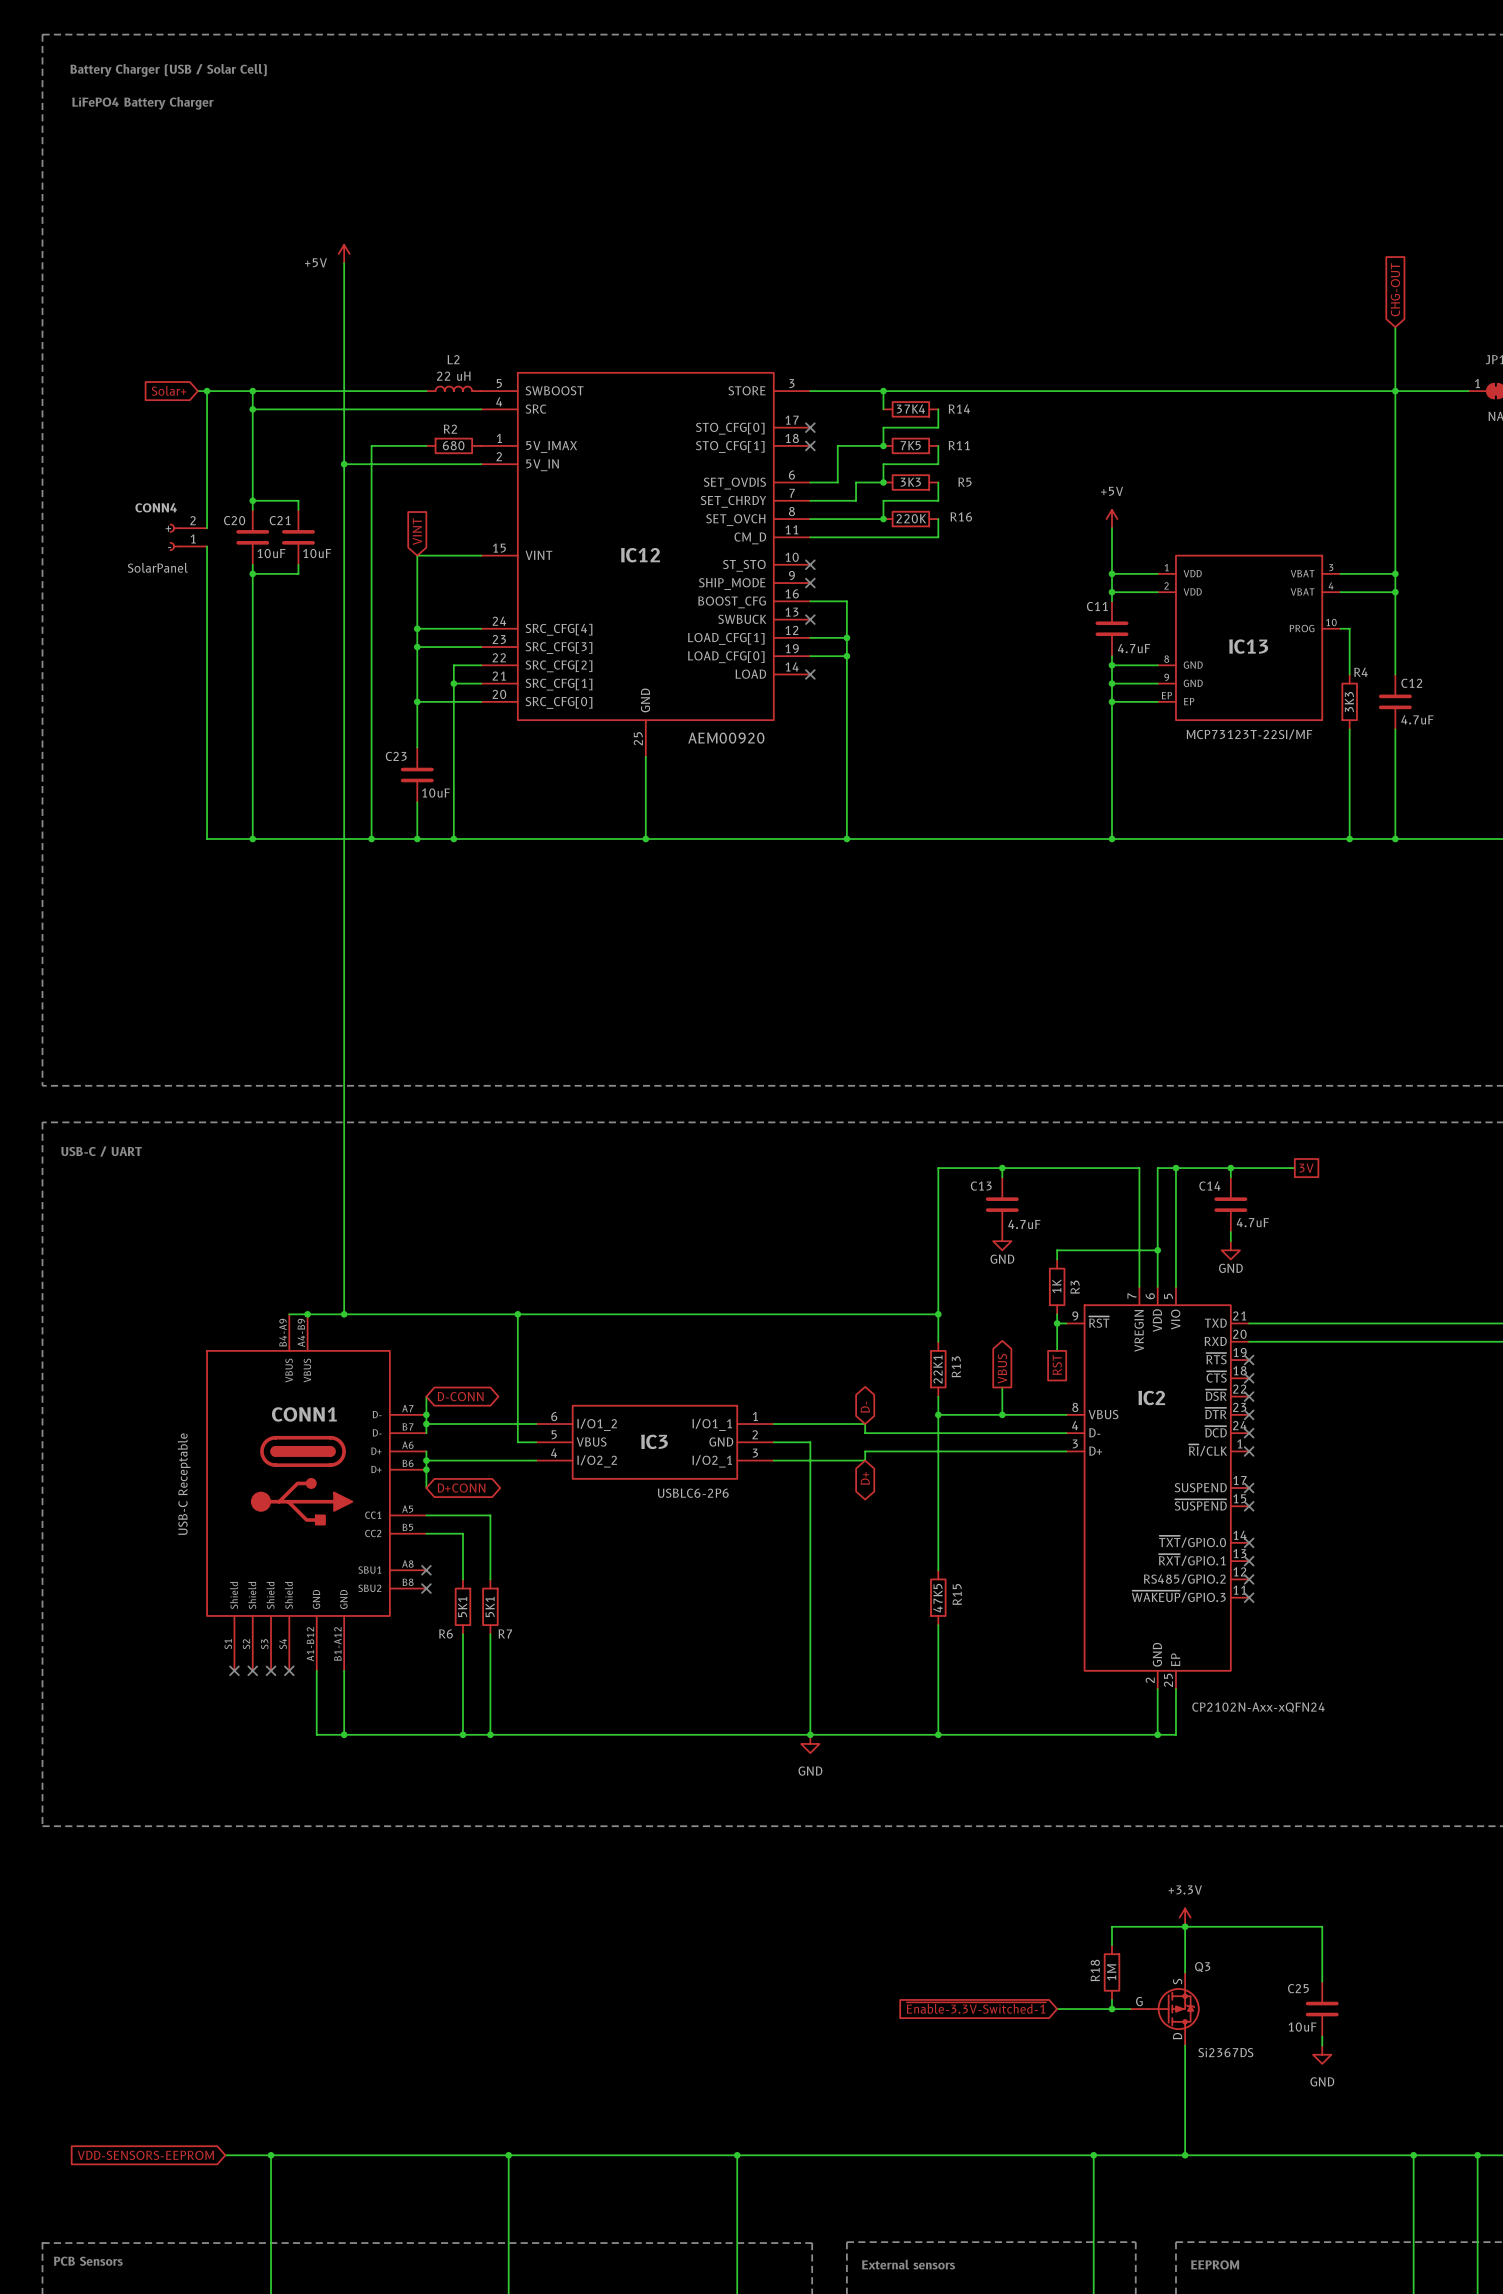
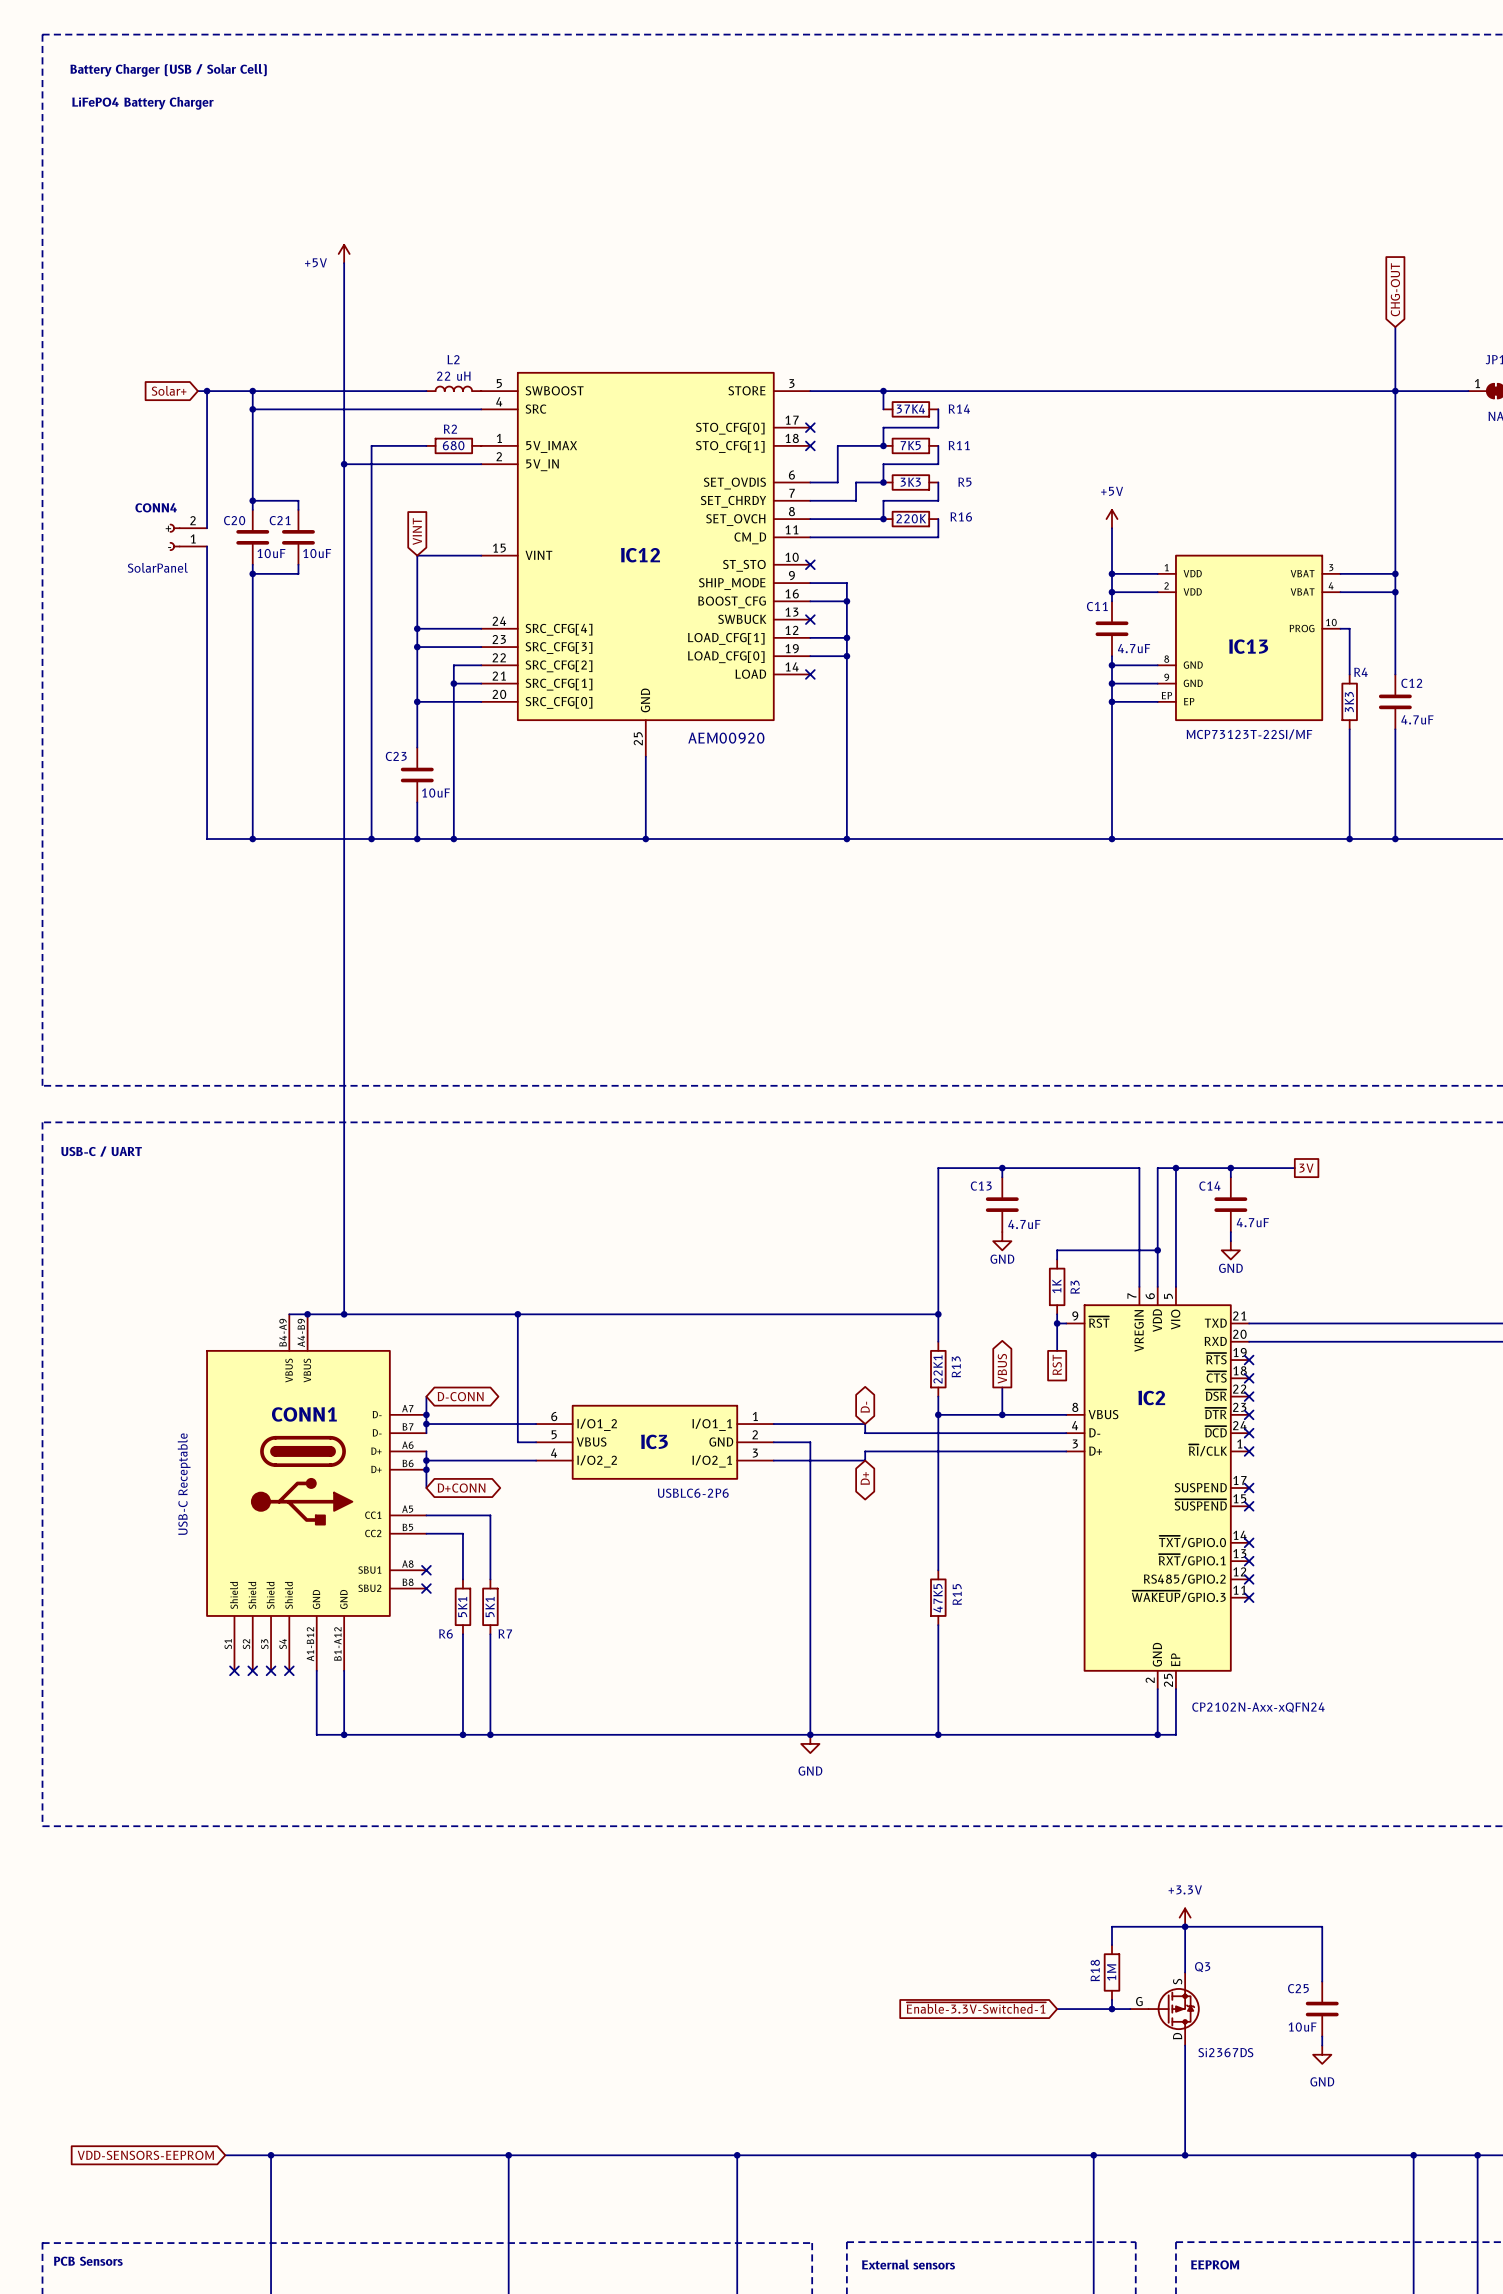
wire: none -> (810, 583) (846, 583) (846, 601)
no-connect mark: (810, 583) -> none
junction: none -> (846, 601)

